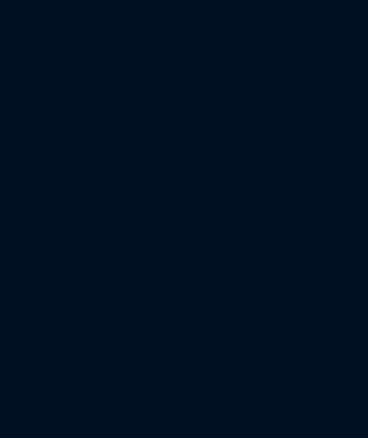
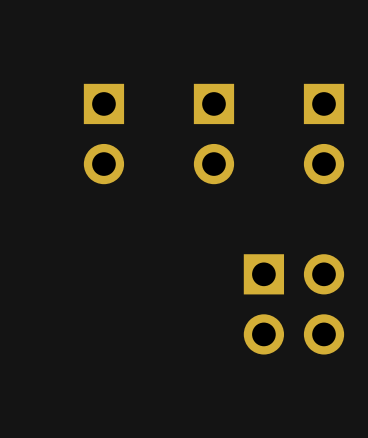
part: none -> (103, 134)
part: none -> (213, 134)
part: none -> (324, 134)
part: none -> (293, 304)

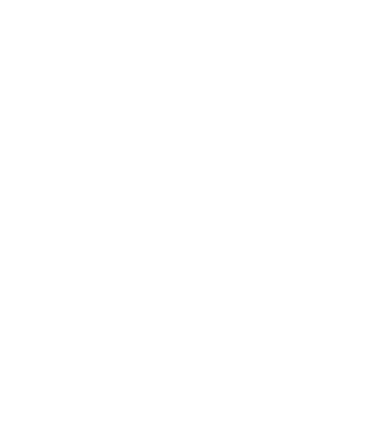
part: (103, 134) -> none
part: (213, 134) -> none
part: (324, 134) -> none
part: (293, 304) -> none

